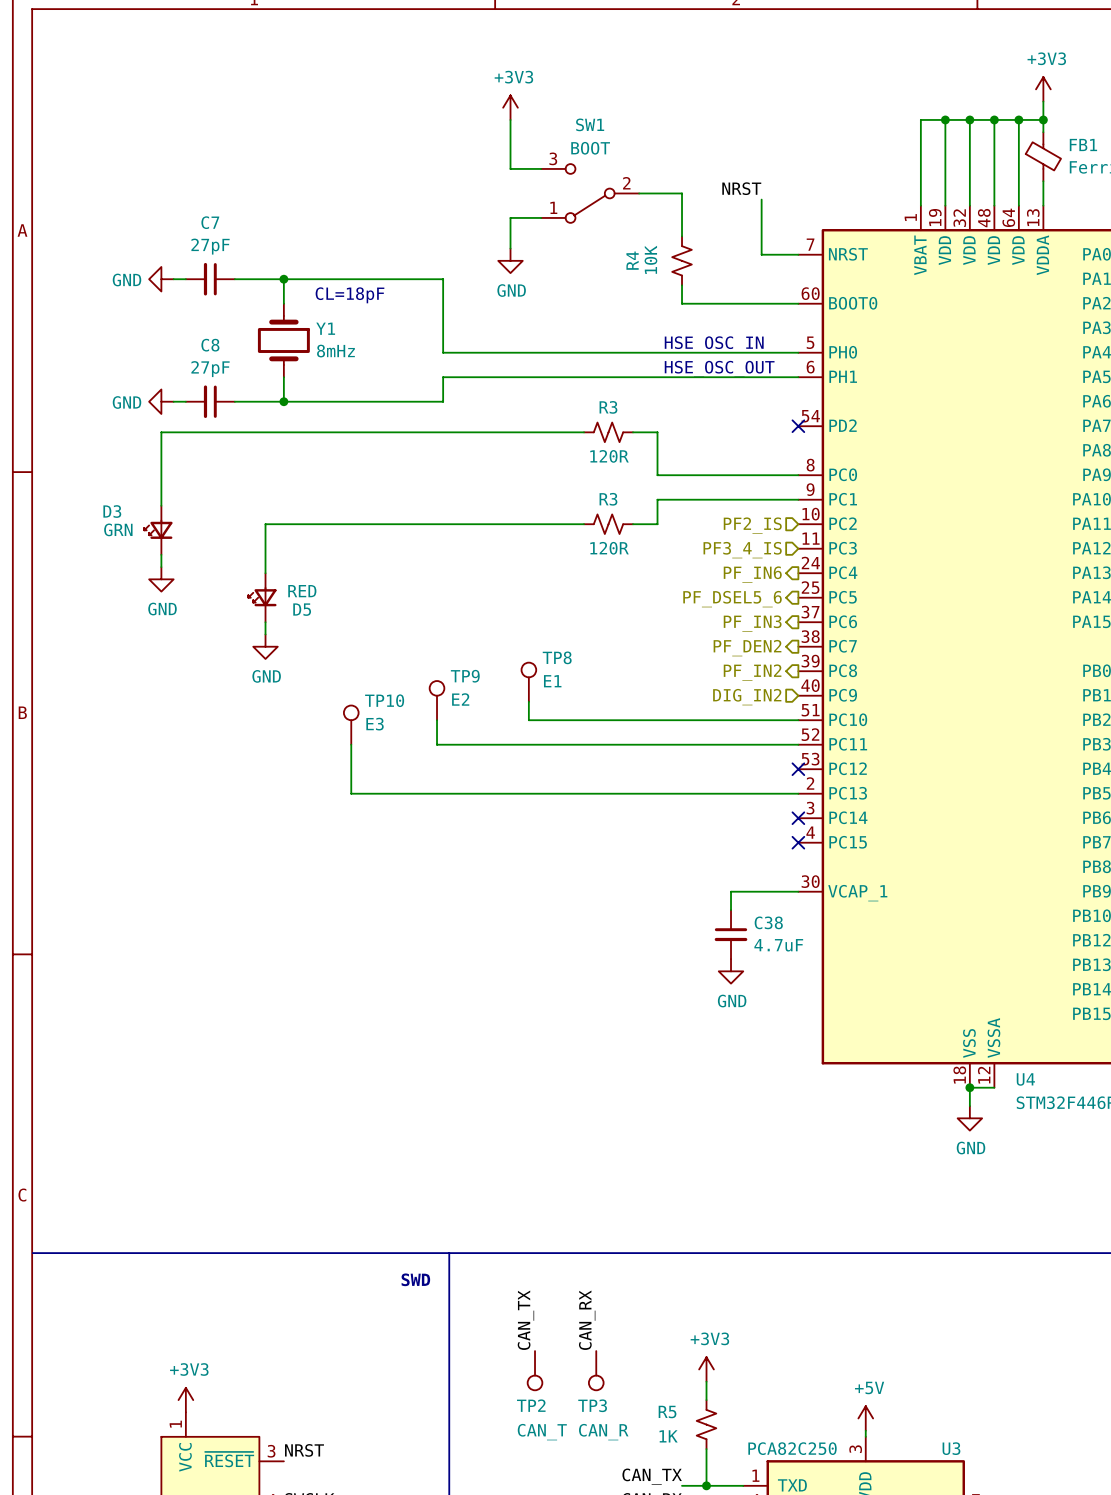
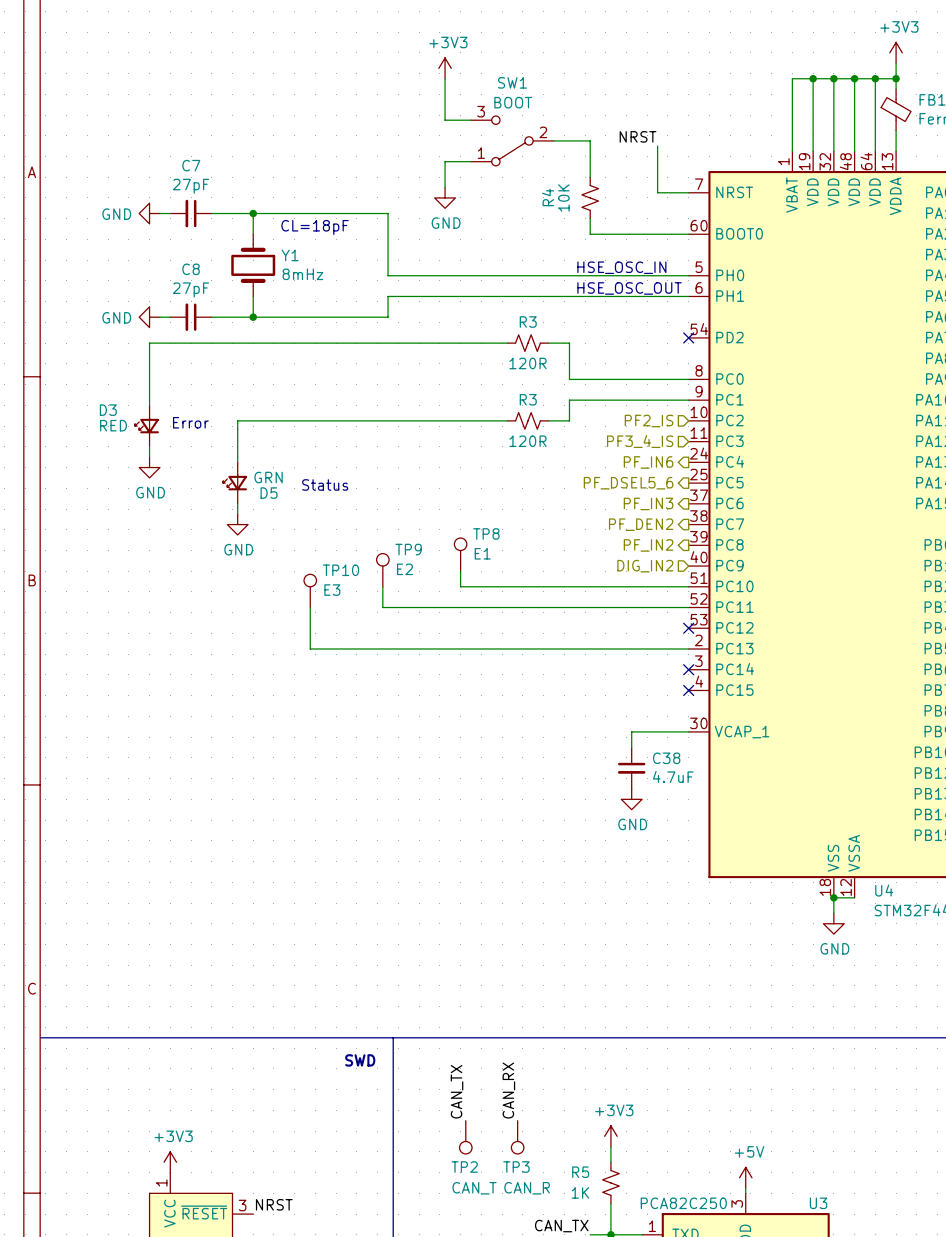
text: none -> Error (190, 422)
D3 value: GRN (118, 529) -> RED (113, 425)
D5 value: RED (302, 591) -> GRN (268, 477)
text: none -> Status (325, 484)

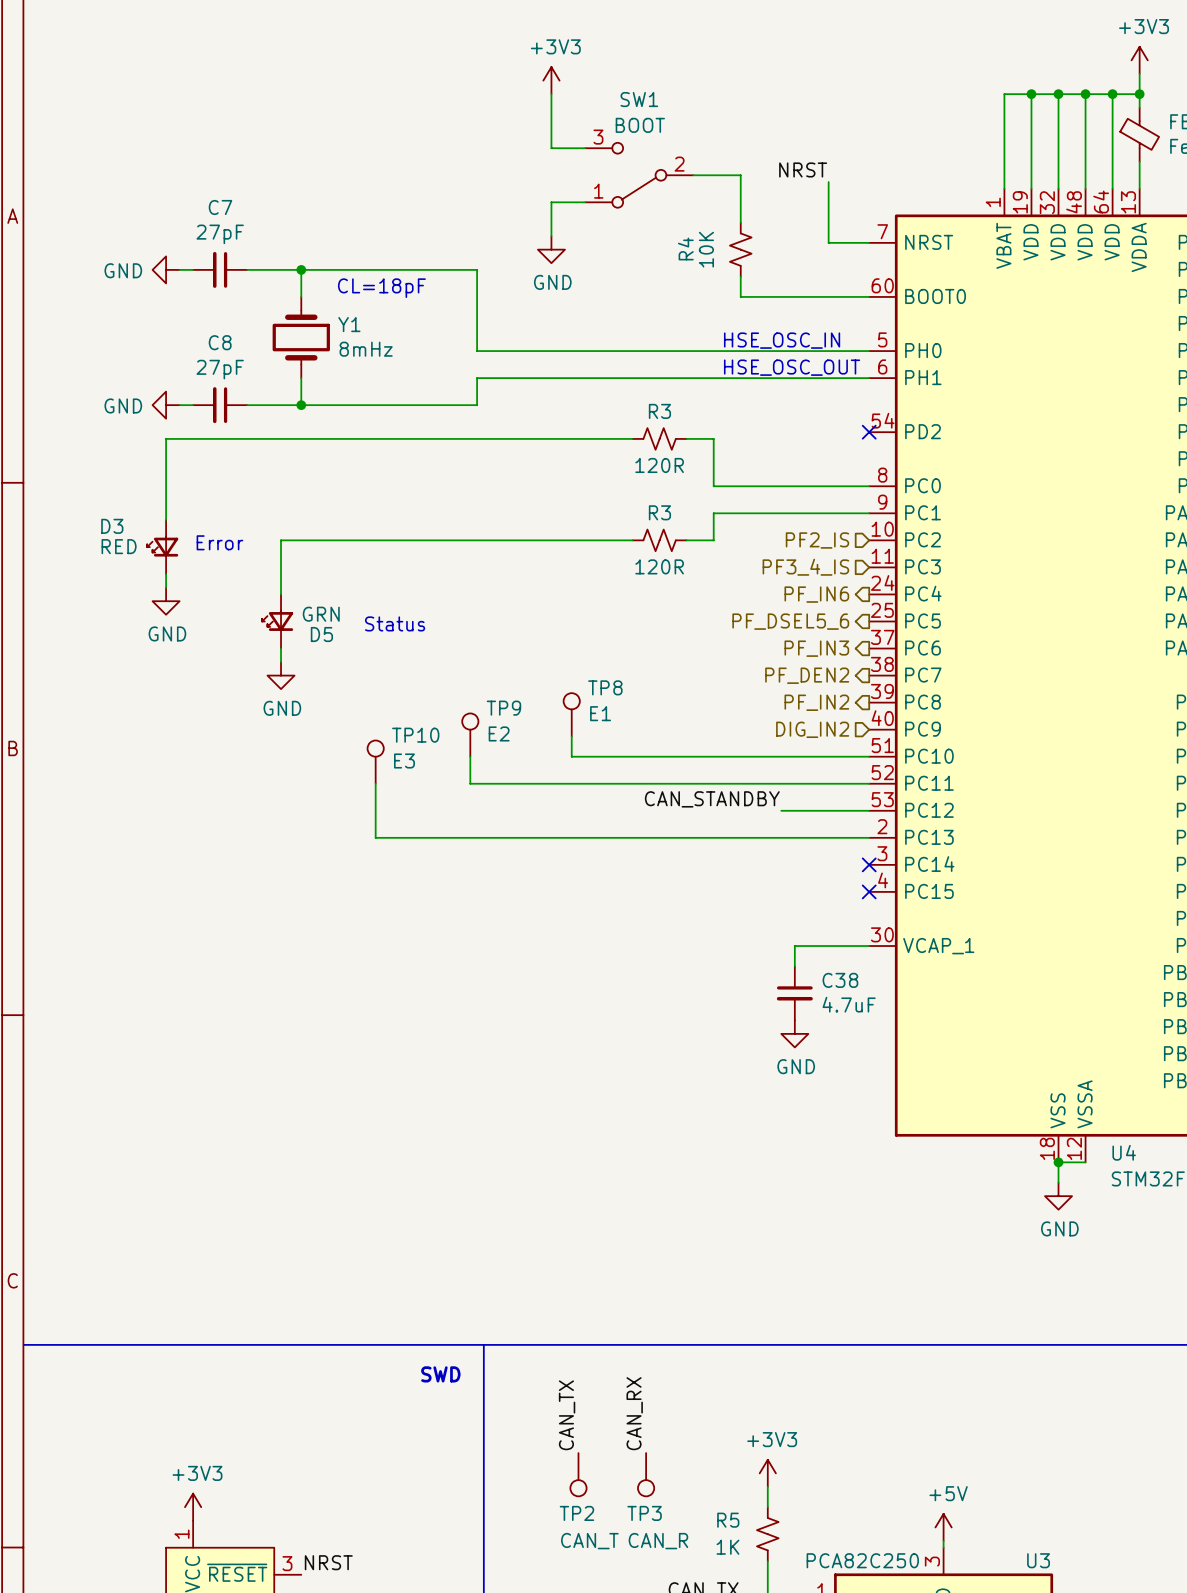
label: none -> CAN_STANDBY (712, 799)
wire: none -> (781, 810) (869, 810)
no-connect mark: (688, 628) -> none

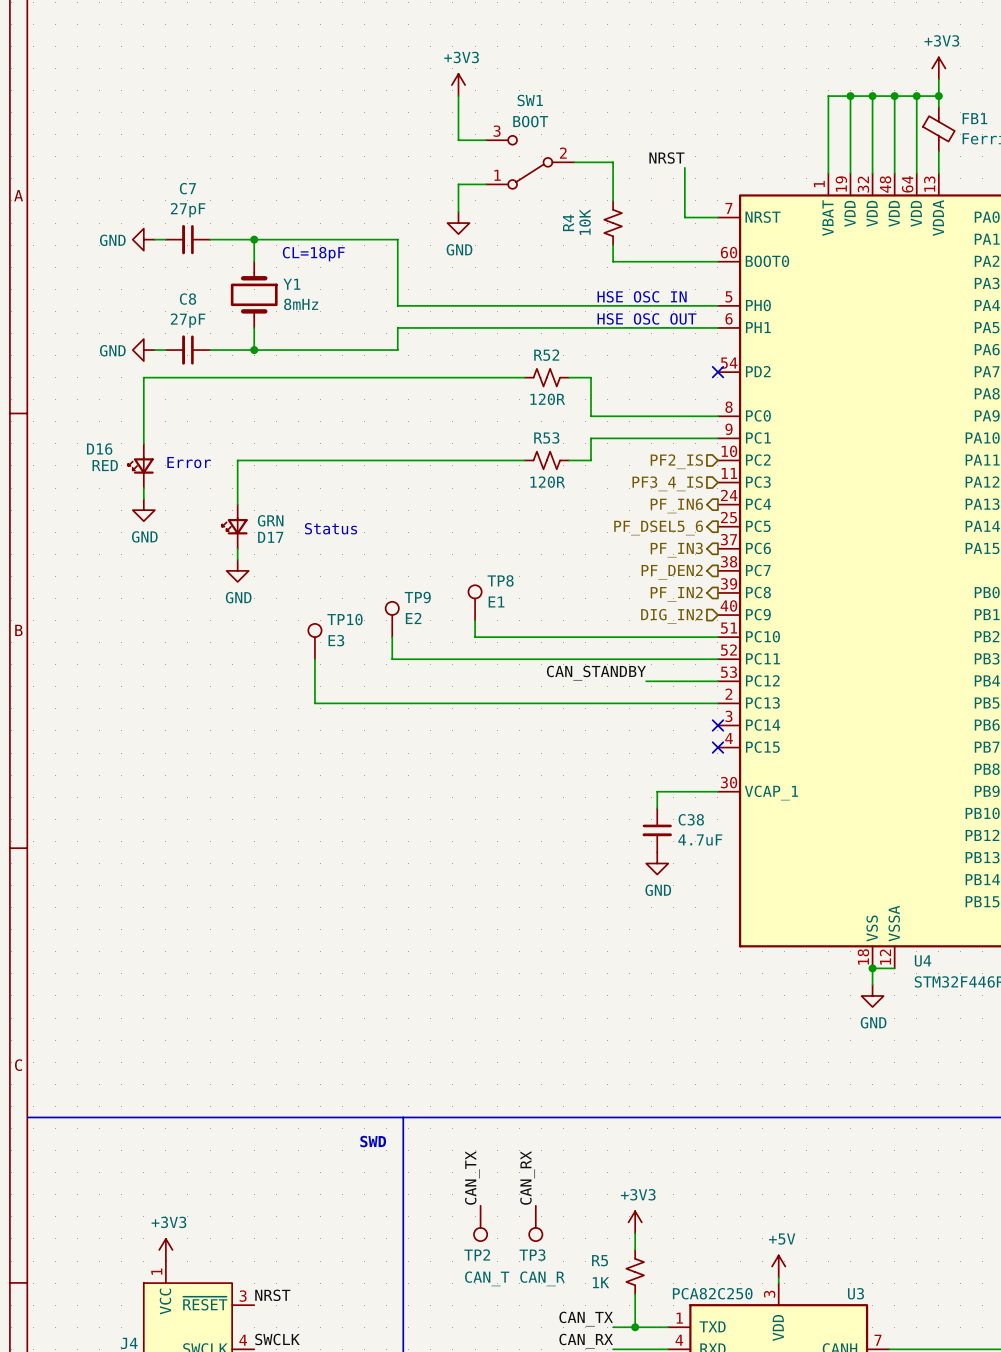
R3 name: R3 (659, 411) -> R52 (546, 355)
R3 name: R3 (659, 512) -> R53 (546, 437)
D3 name: D3 (112, 526) -> D16 (99, 449)
D5 name: D5 (321, 634) -> D17 (270, 537)

